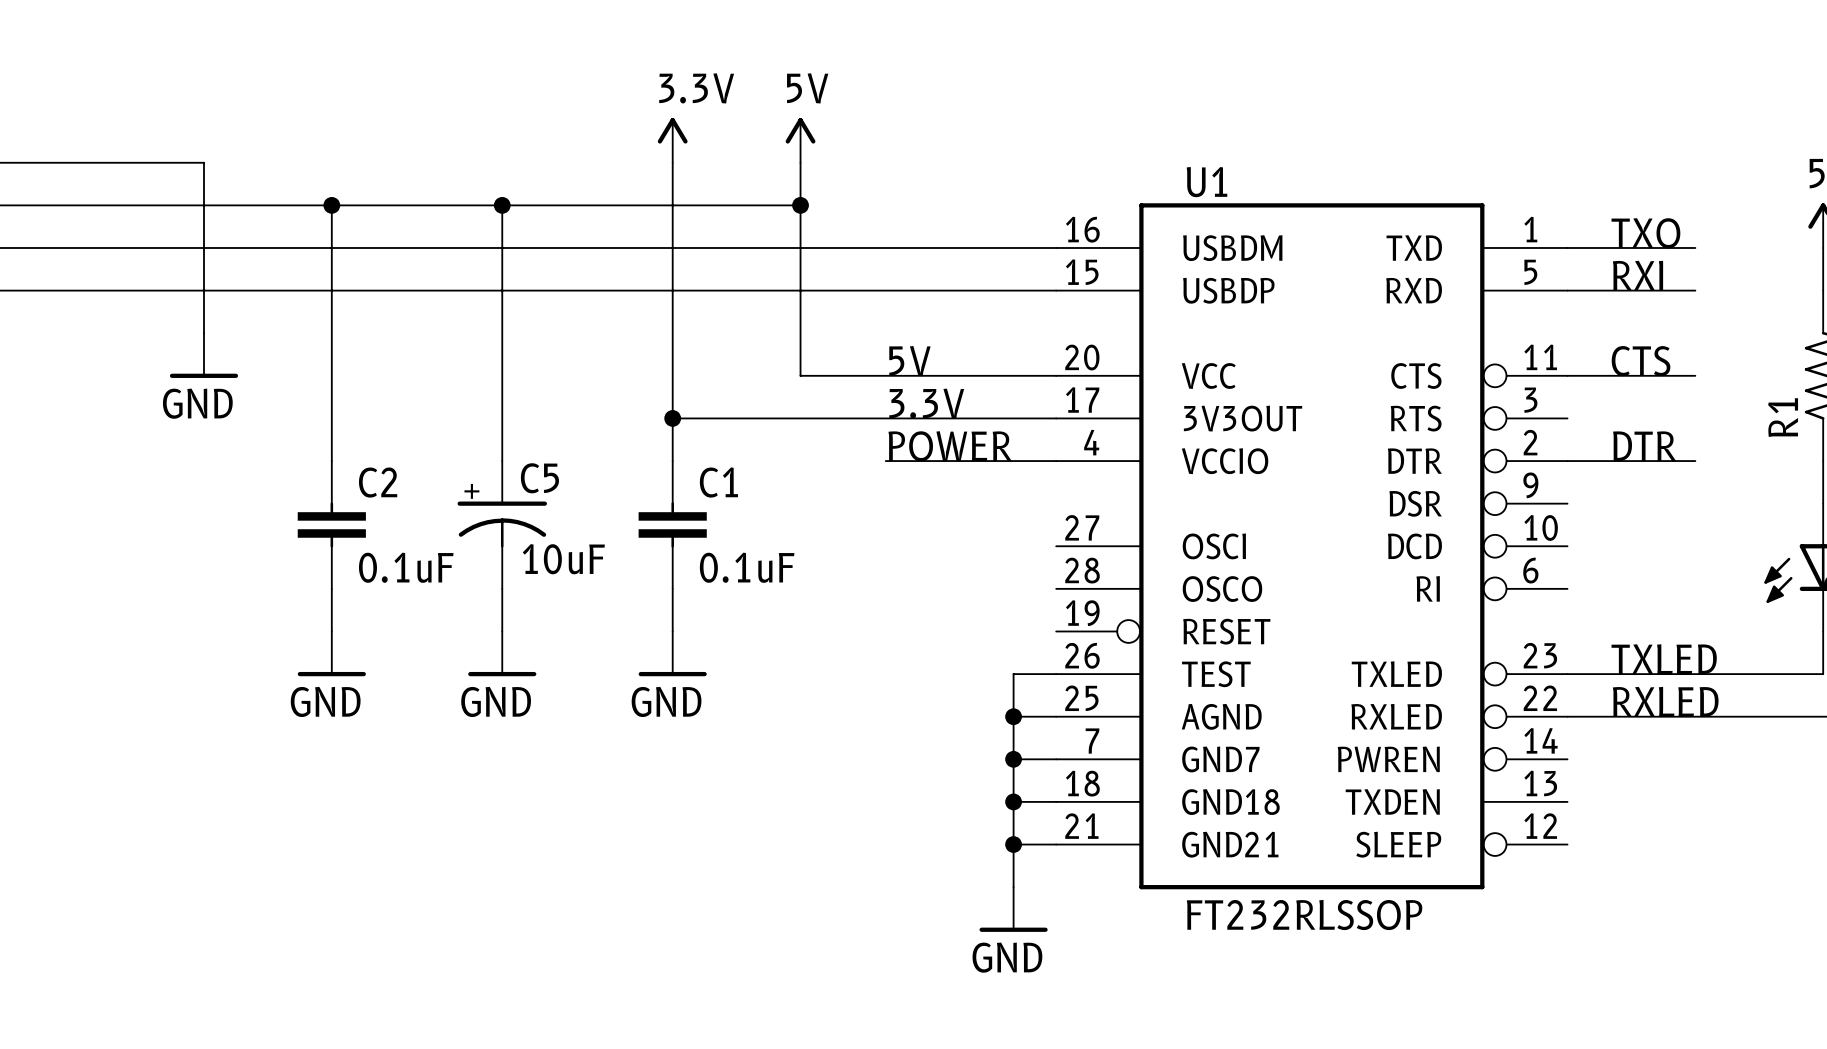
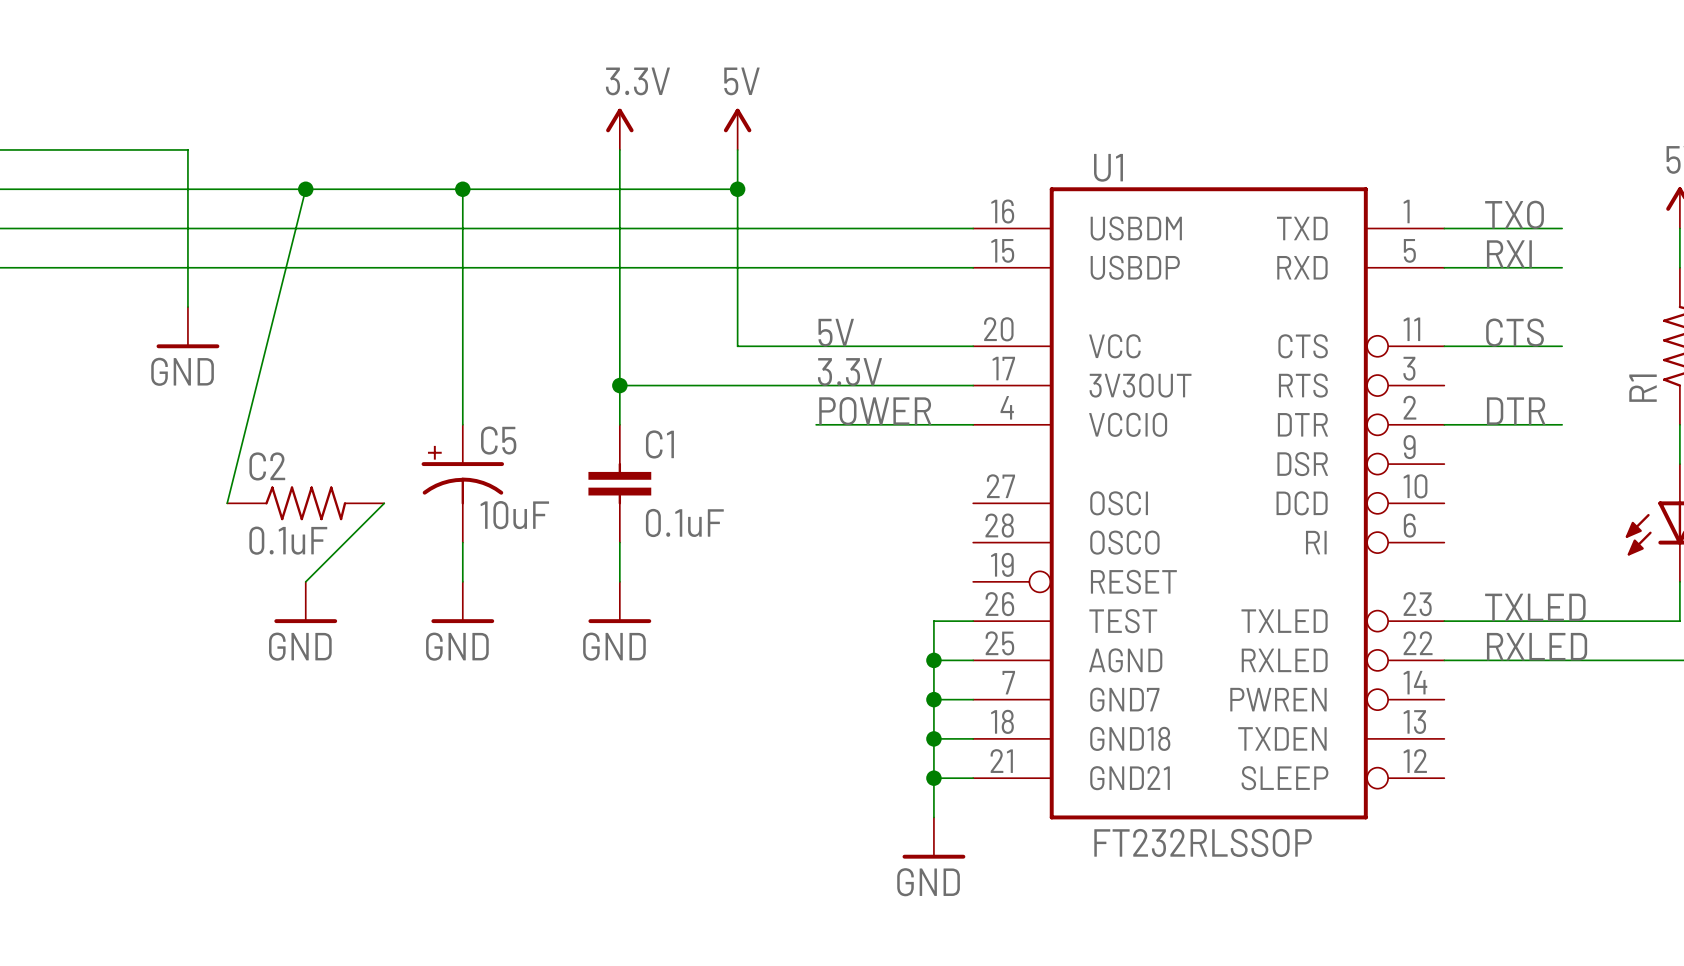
wire: (331, 205) (331, 461) -> (305, 189) (227, 503)
C2 symbol: [297, 461, 366, 589] -> [227, 486, 385, 521]
C2 name position: C2 (378, 482) -> C2 (267, 466)
C2 value position: 0.1uF (406, 567) -> 0.1uF (288, 540)
wire: (331, 588) (331, 631) -> (384, 503) (305, 581)

